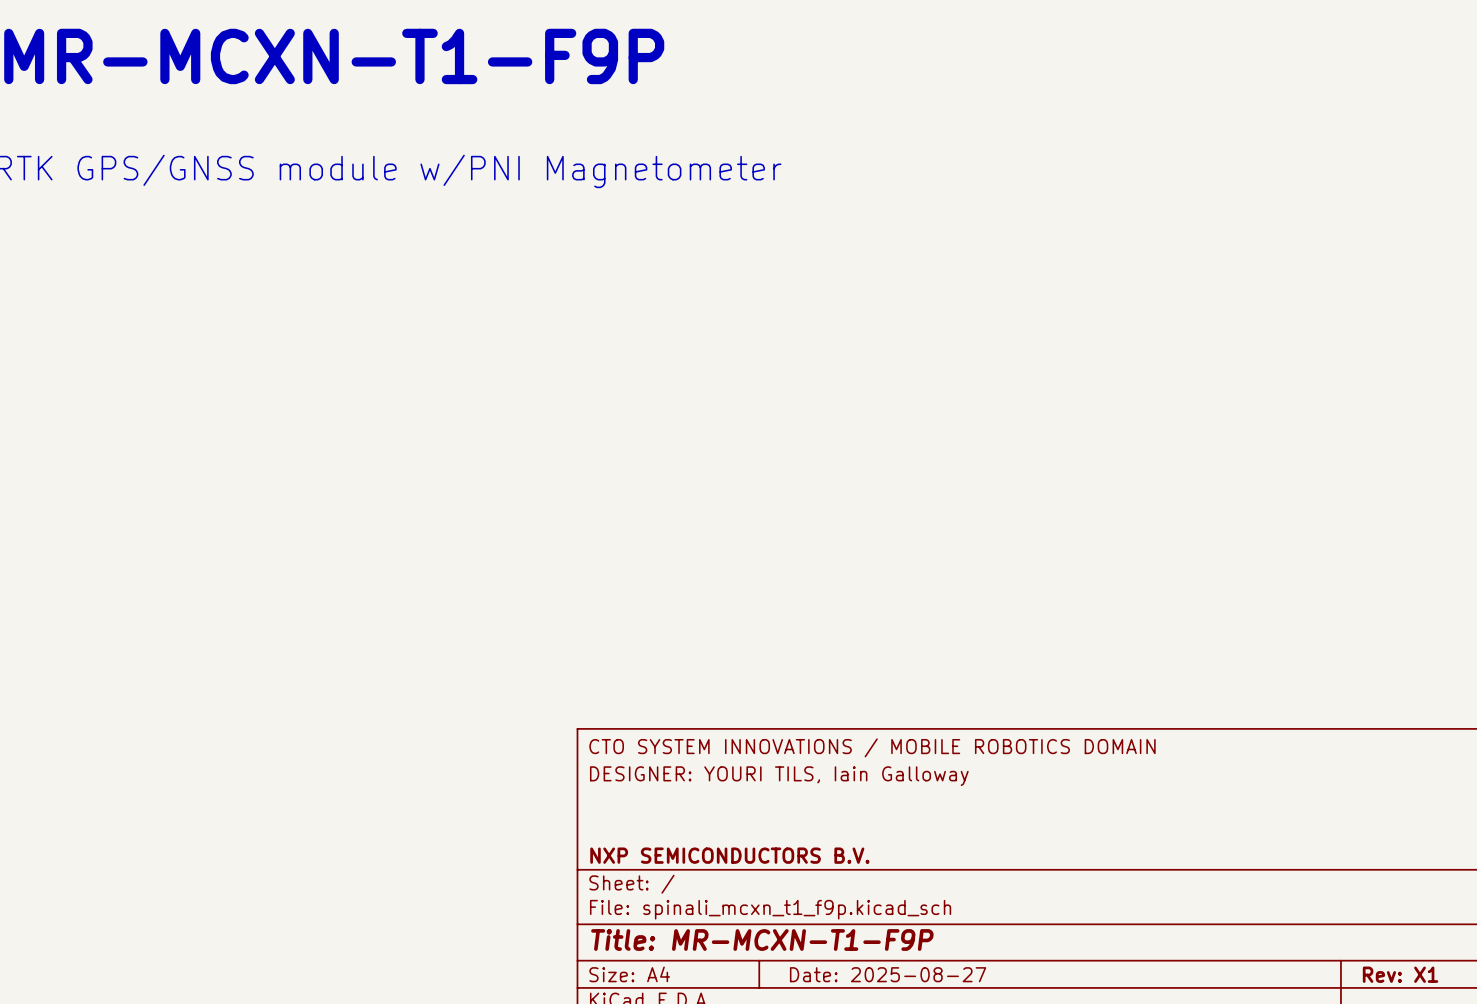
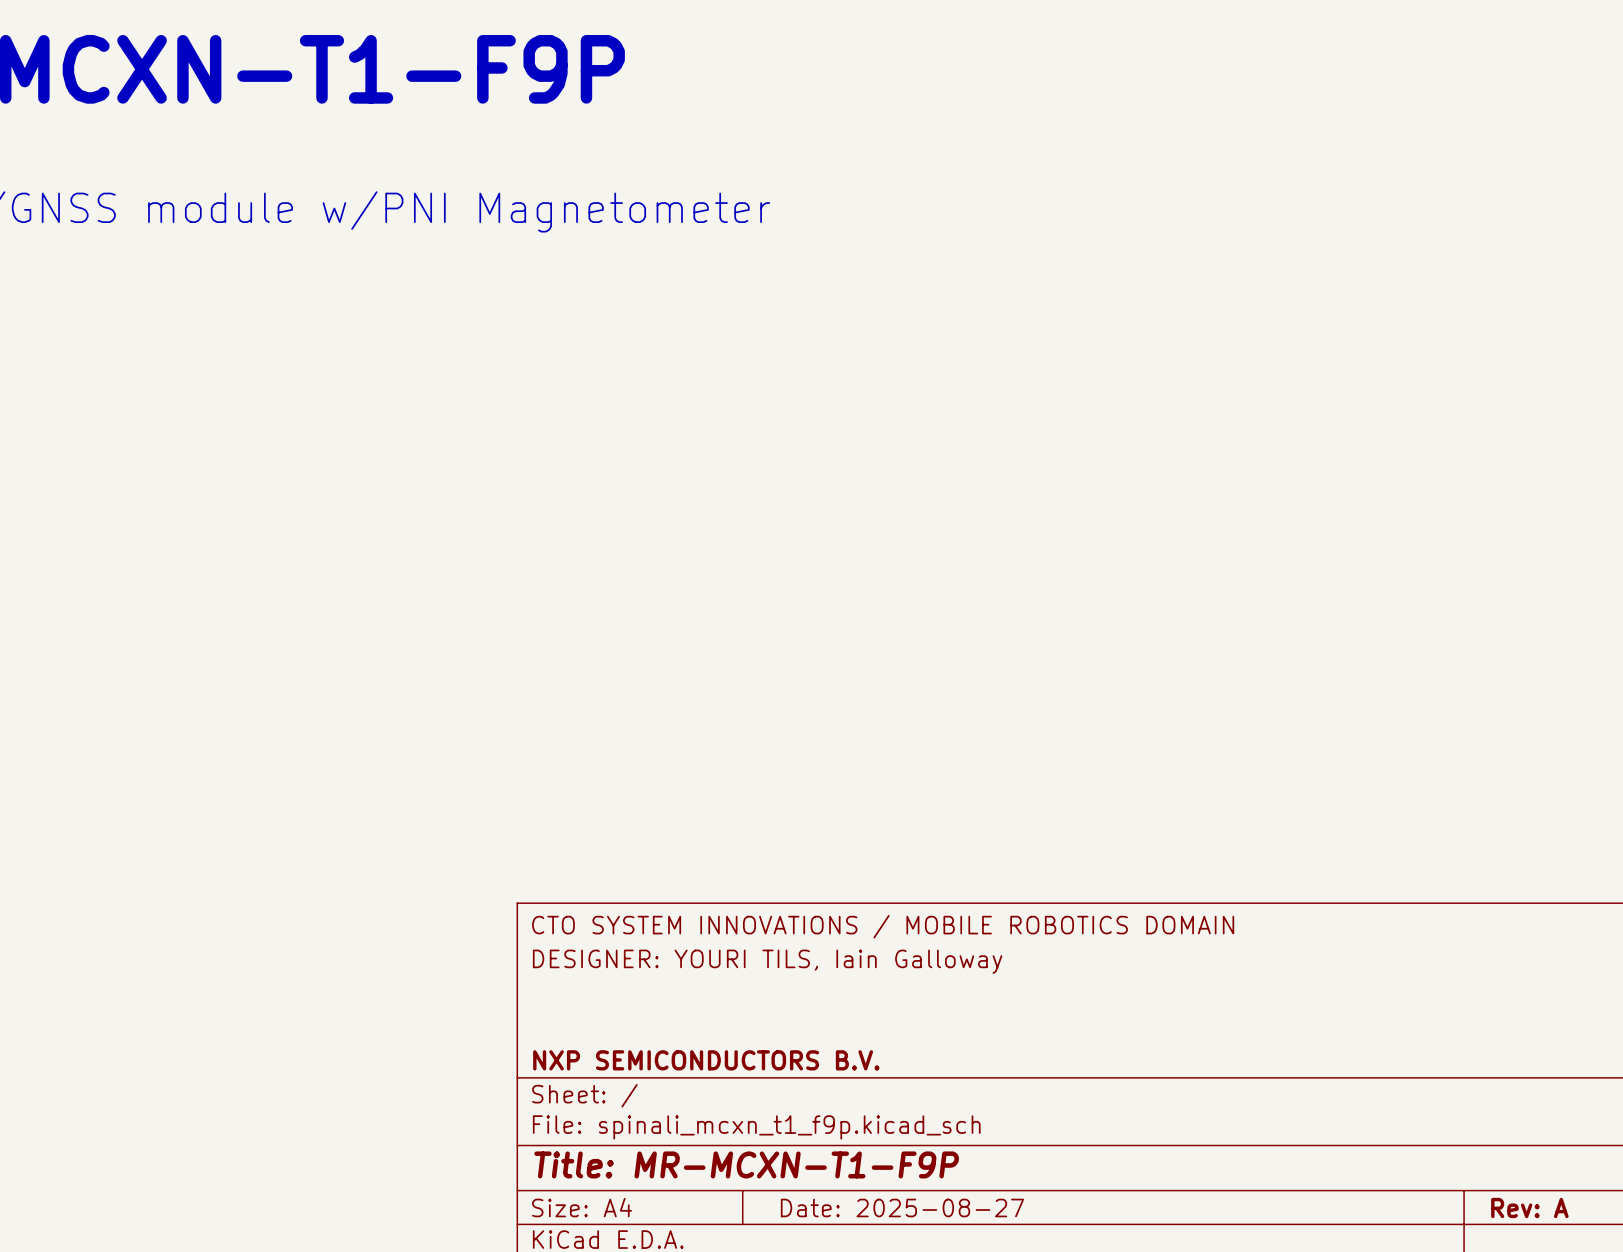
title block: Rev: X1 (1400, 974) -> Rev: A (1529, 1207)

